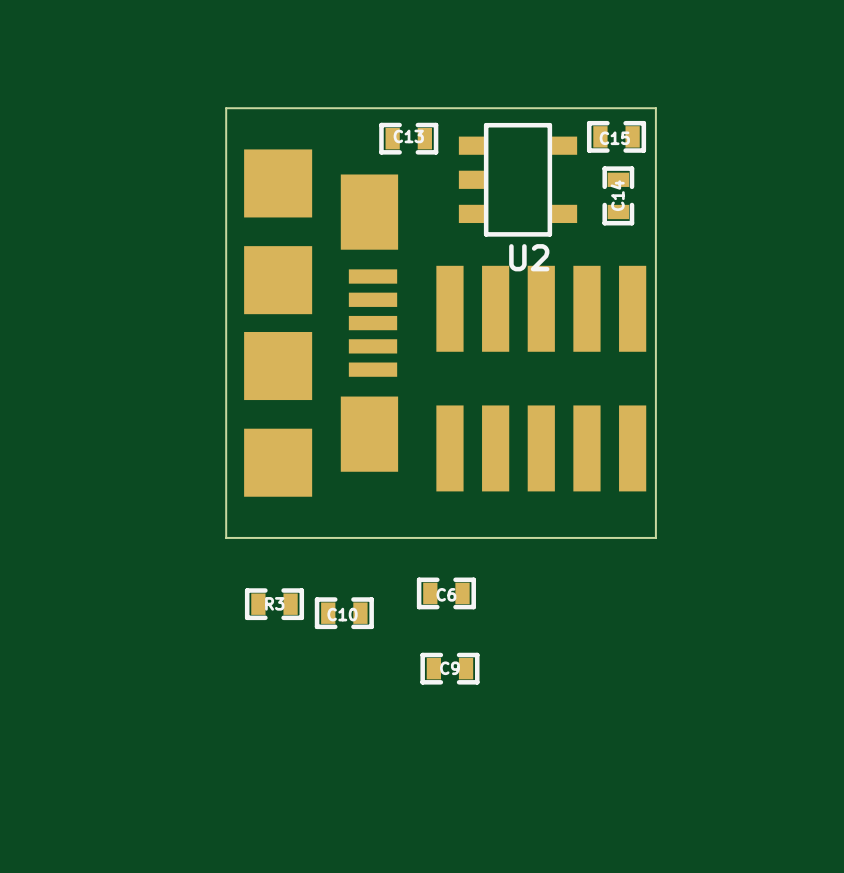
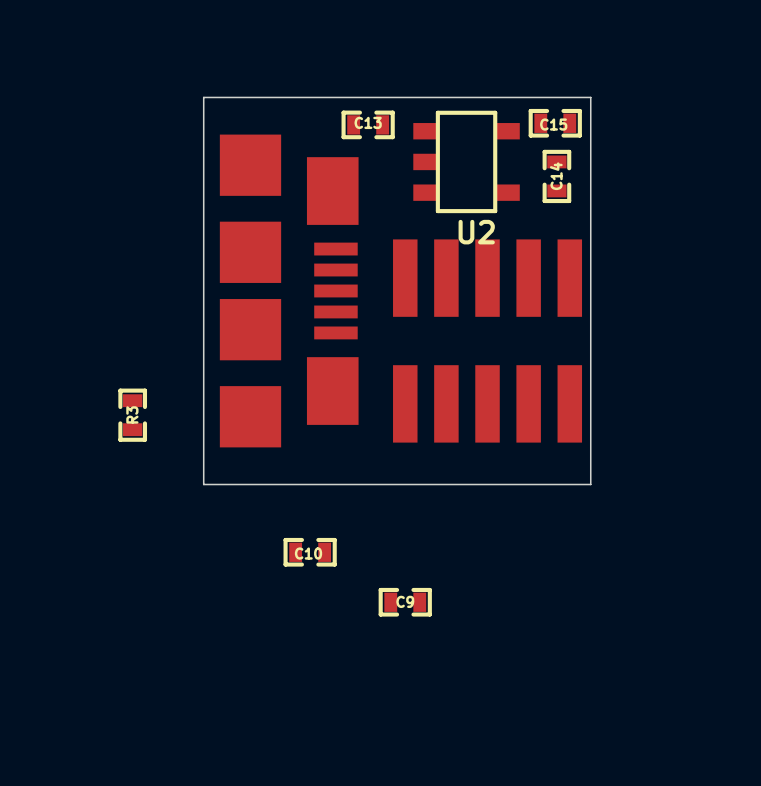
C6: (446, 593) -> none
R3 rotation: 0° (274, 604) -> 90° clockwise (132, 415)
R3 position: (274, 604) -> (132, 415)

